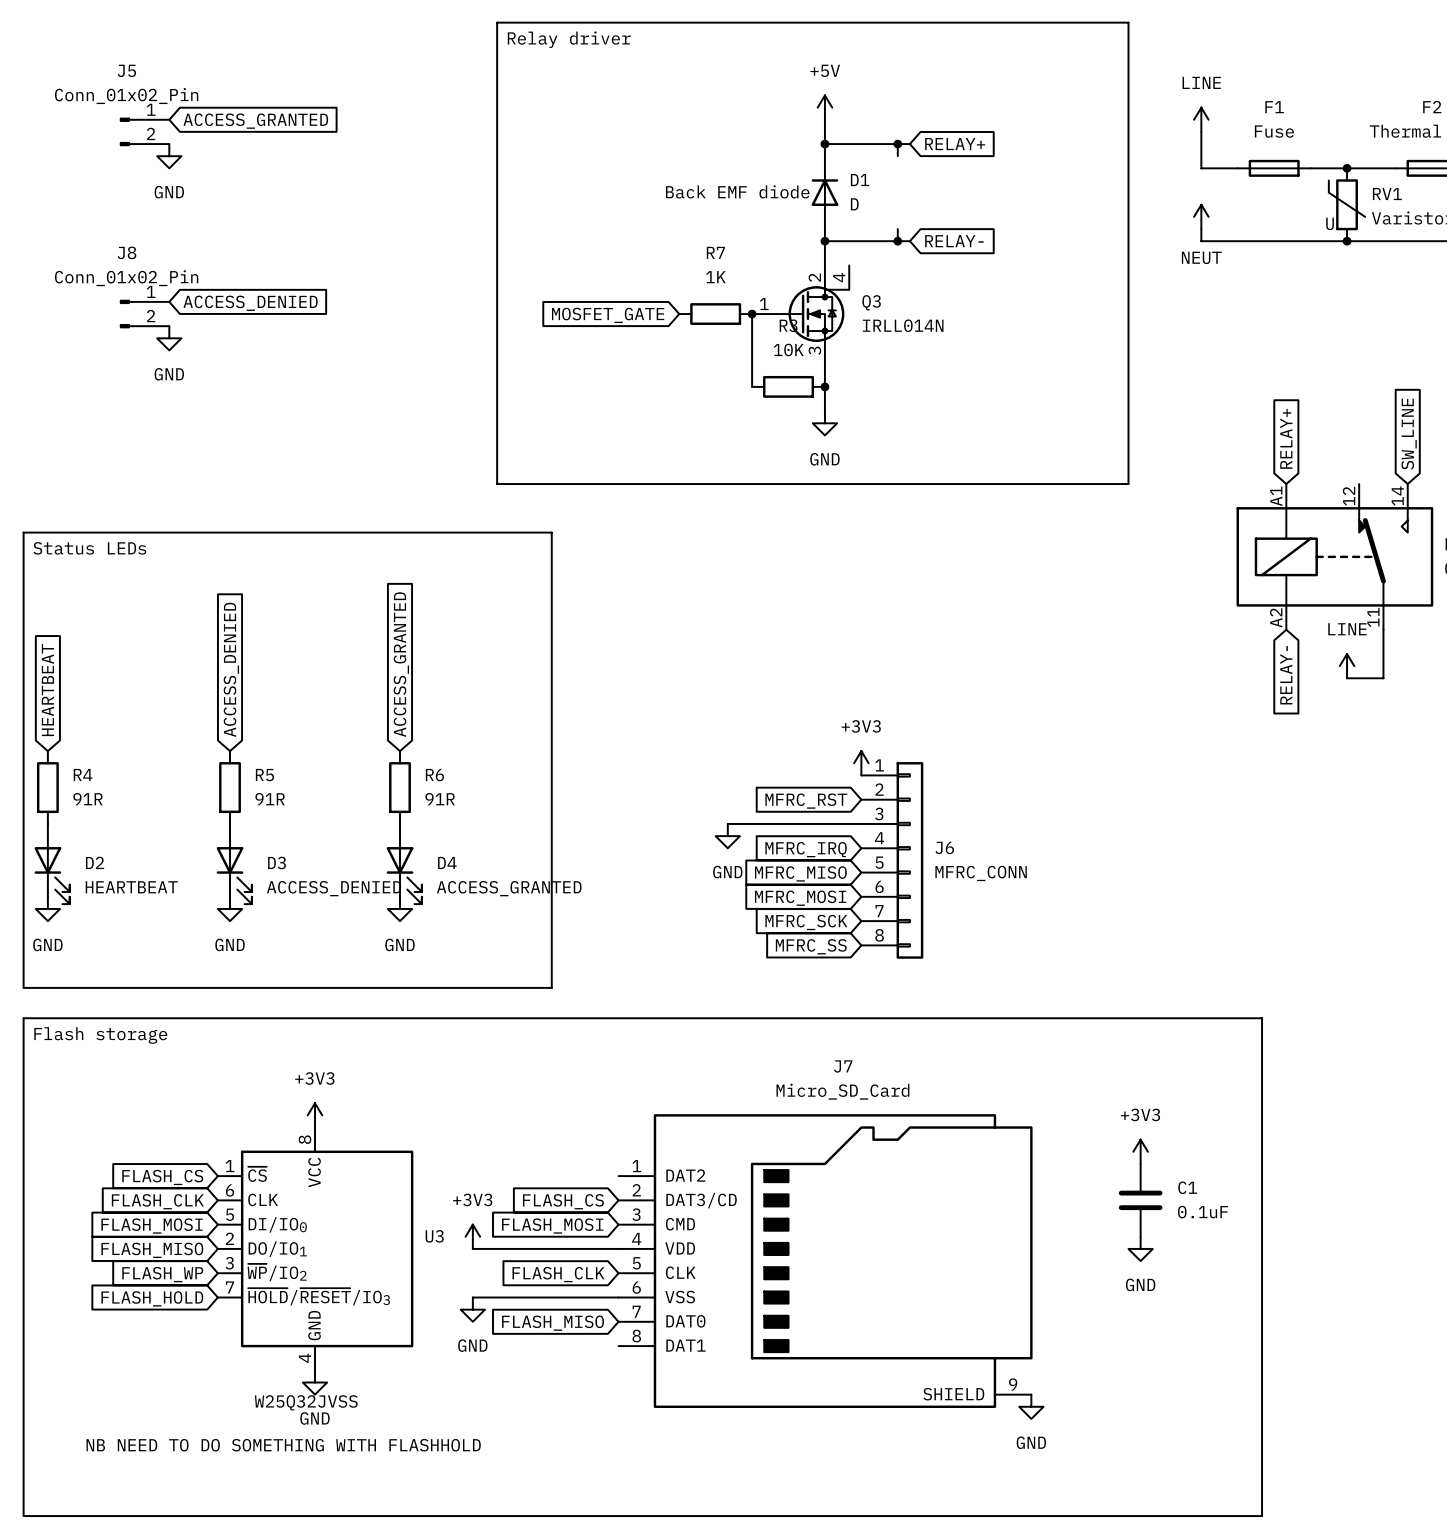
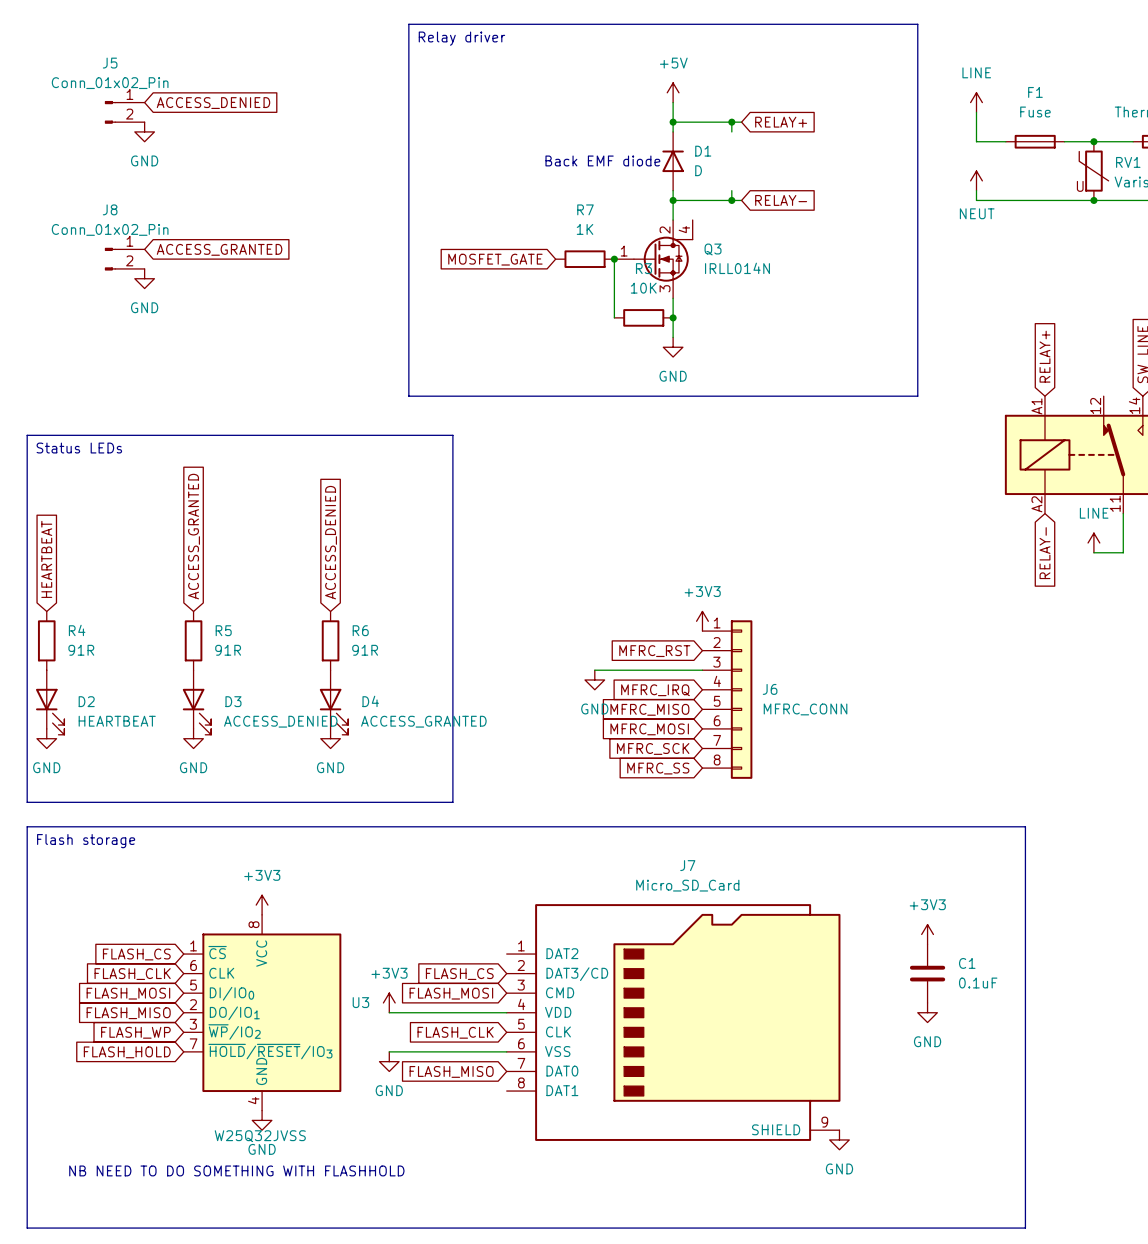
global label: ACCESS_GRANTED (255, 121) -> ACCESS_DENIED (213, 103)
global label: ACCESS_DENIED (250, 303) -> ACCESS_GRANTED (219, 249)
global label: ACCESS_GRANTED (401, 664) -> ACCESS_DENIED (331, 542)
global label: ACCESS_DENIED (231, 669) -> ACCESS_GRANTED (194, 536)

